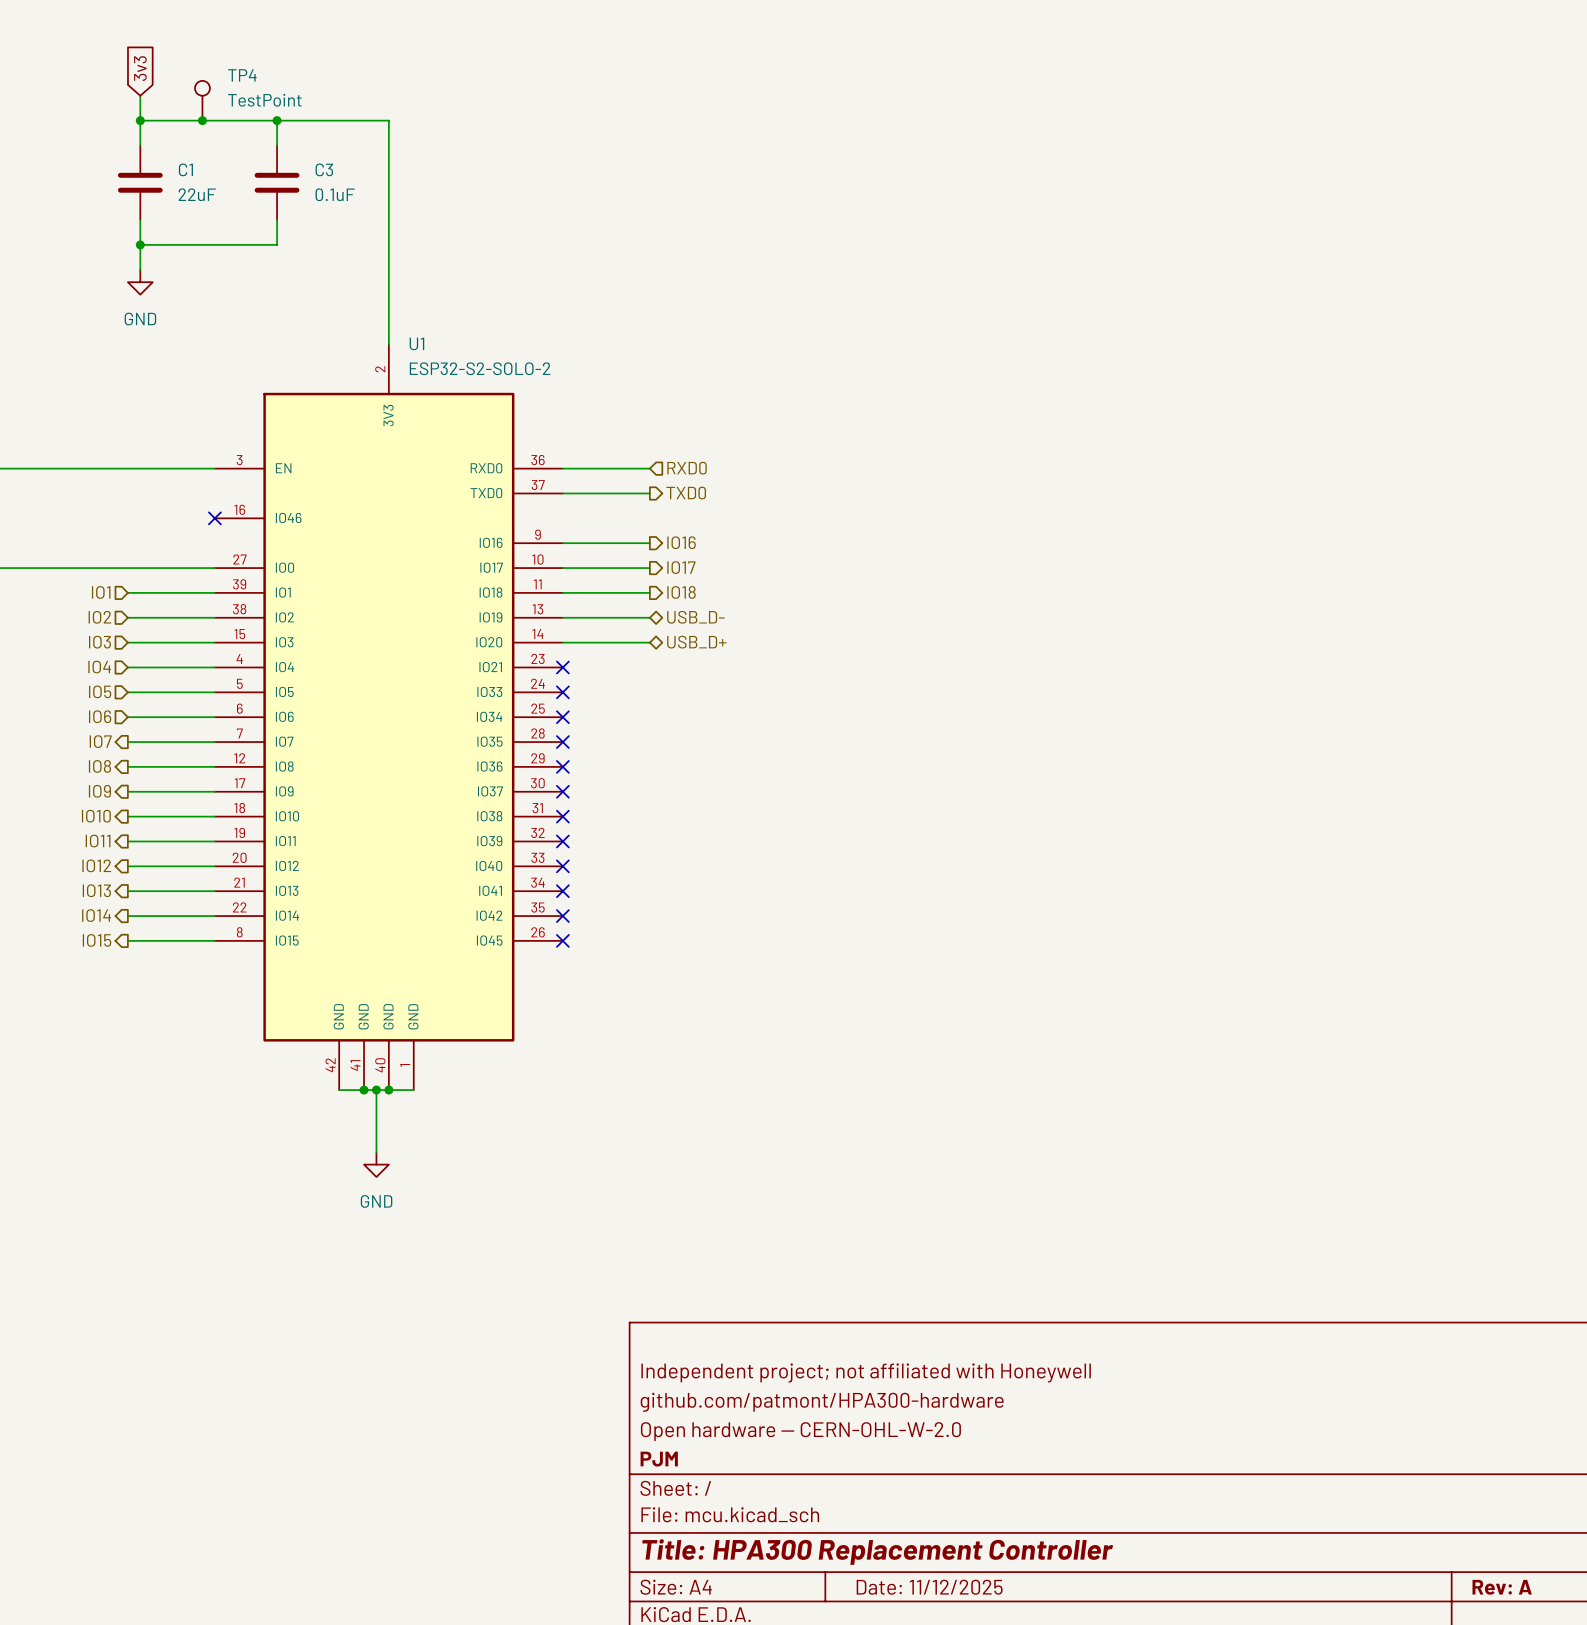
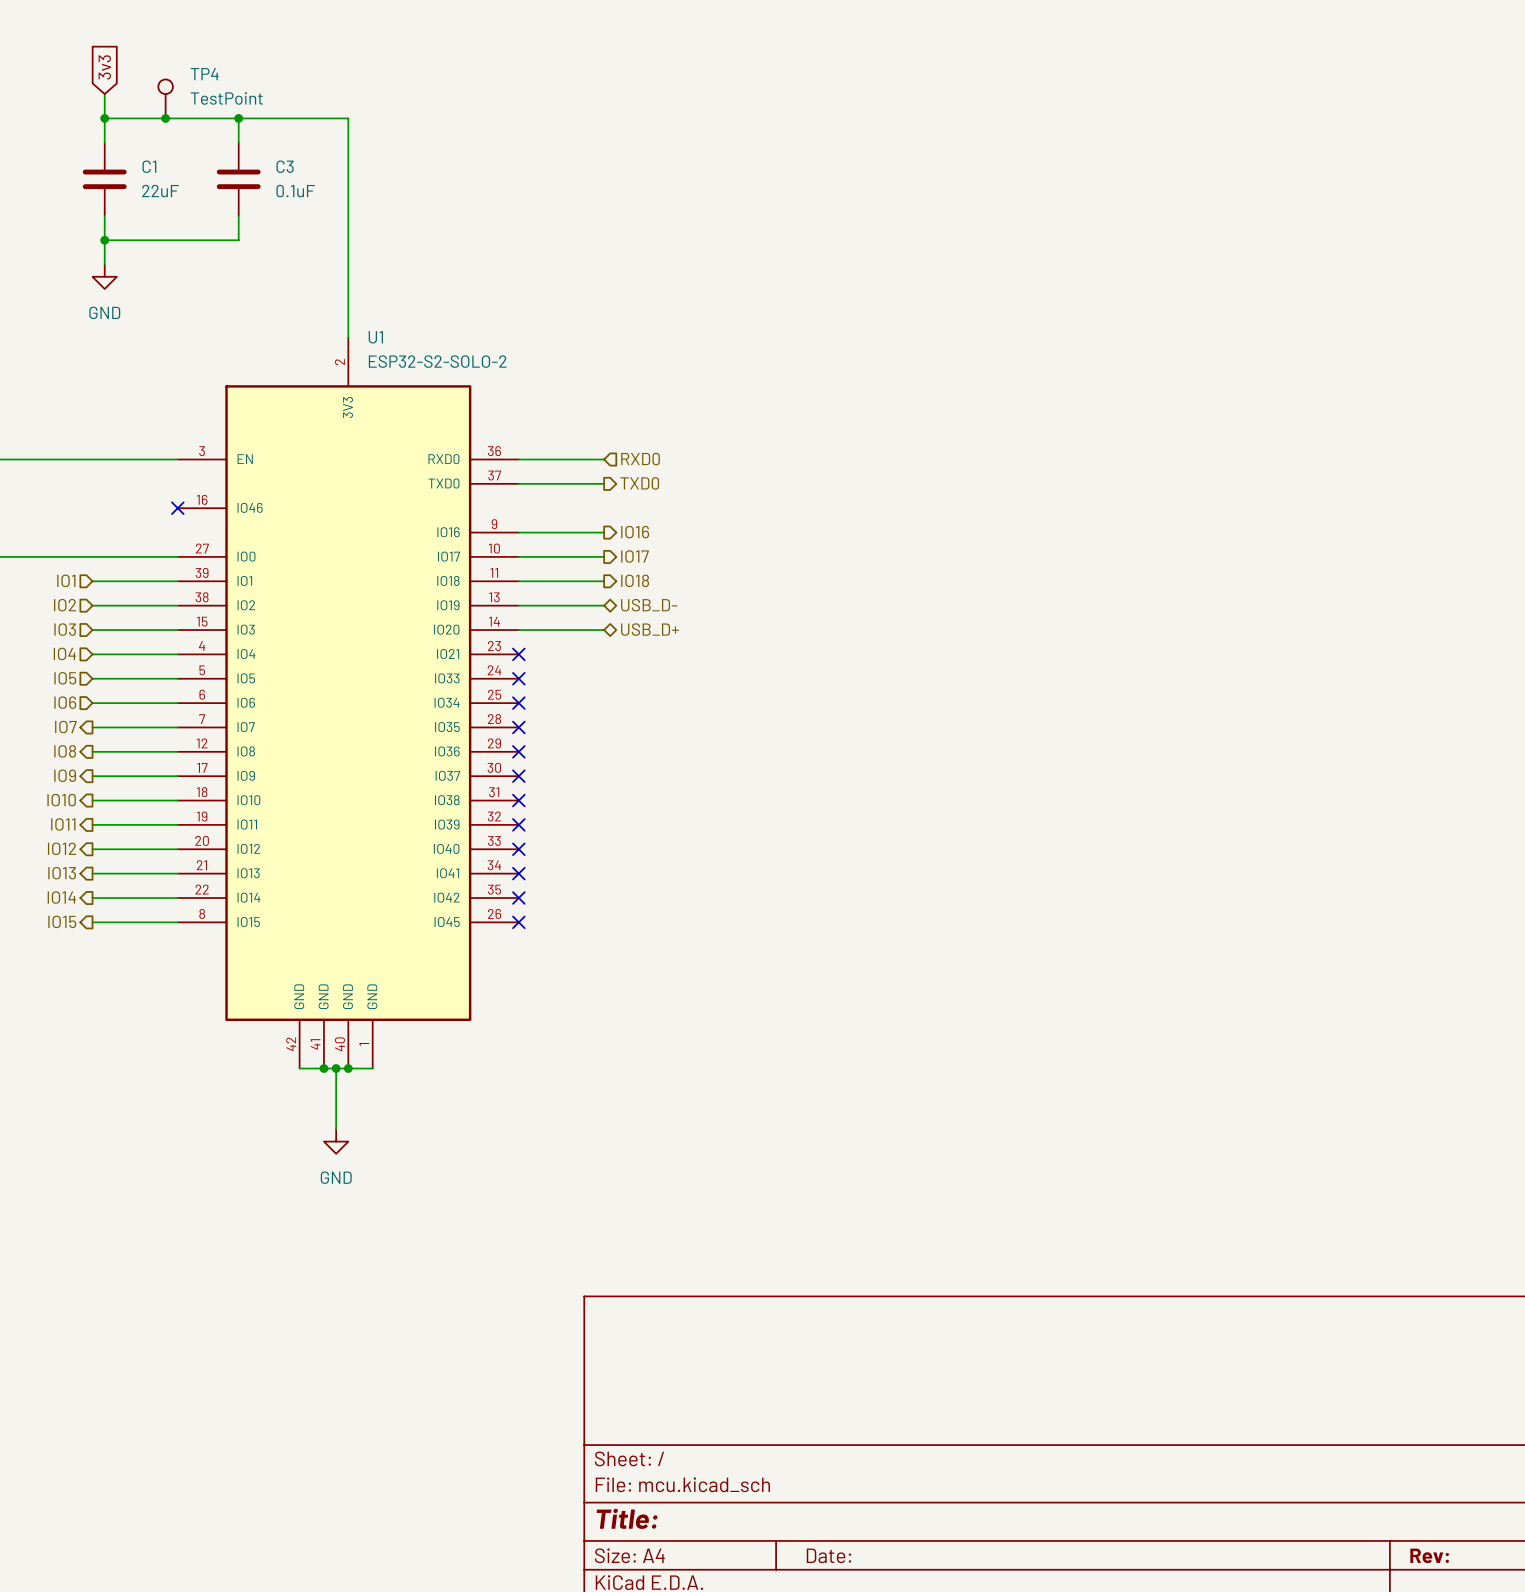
title block: Independent project; not affiliated with Honeywell (866, 1373) -> none
title block: github.com/patmont/HPA300-hardware (822, 1402) -> none
title block: Open hardware — CERN-OHL-W-2.0 (800, 1431) -> none
title block: PJM (659, 1459) -> none
title block: Title: HPA300 Replacement Controller (877, 1552) -> Title: (627, 1518)
title block: Date: 11/12/2025 (929, 1587) -> Date: (828, 1555)
title block: Rev: A (1502, 1587) -> Rev: (1429, 1555)

